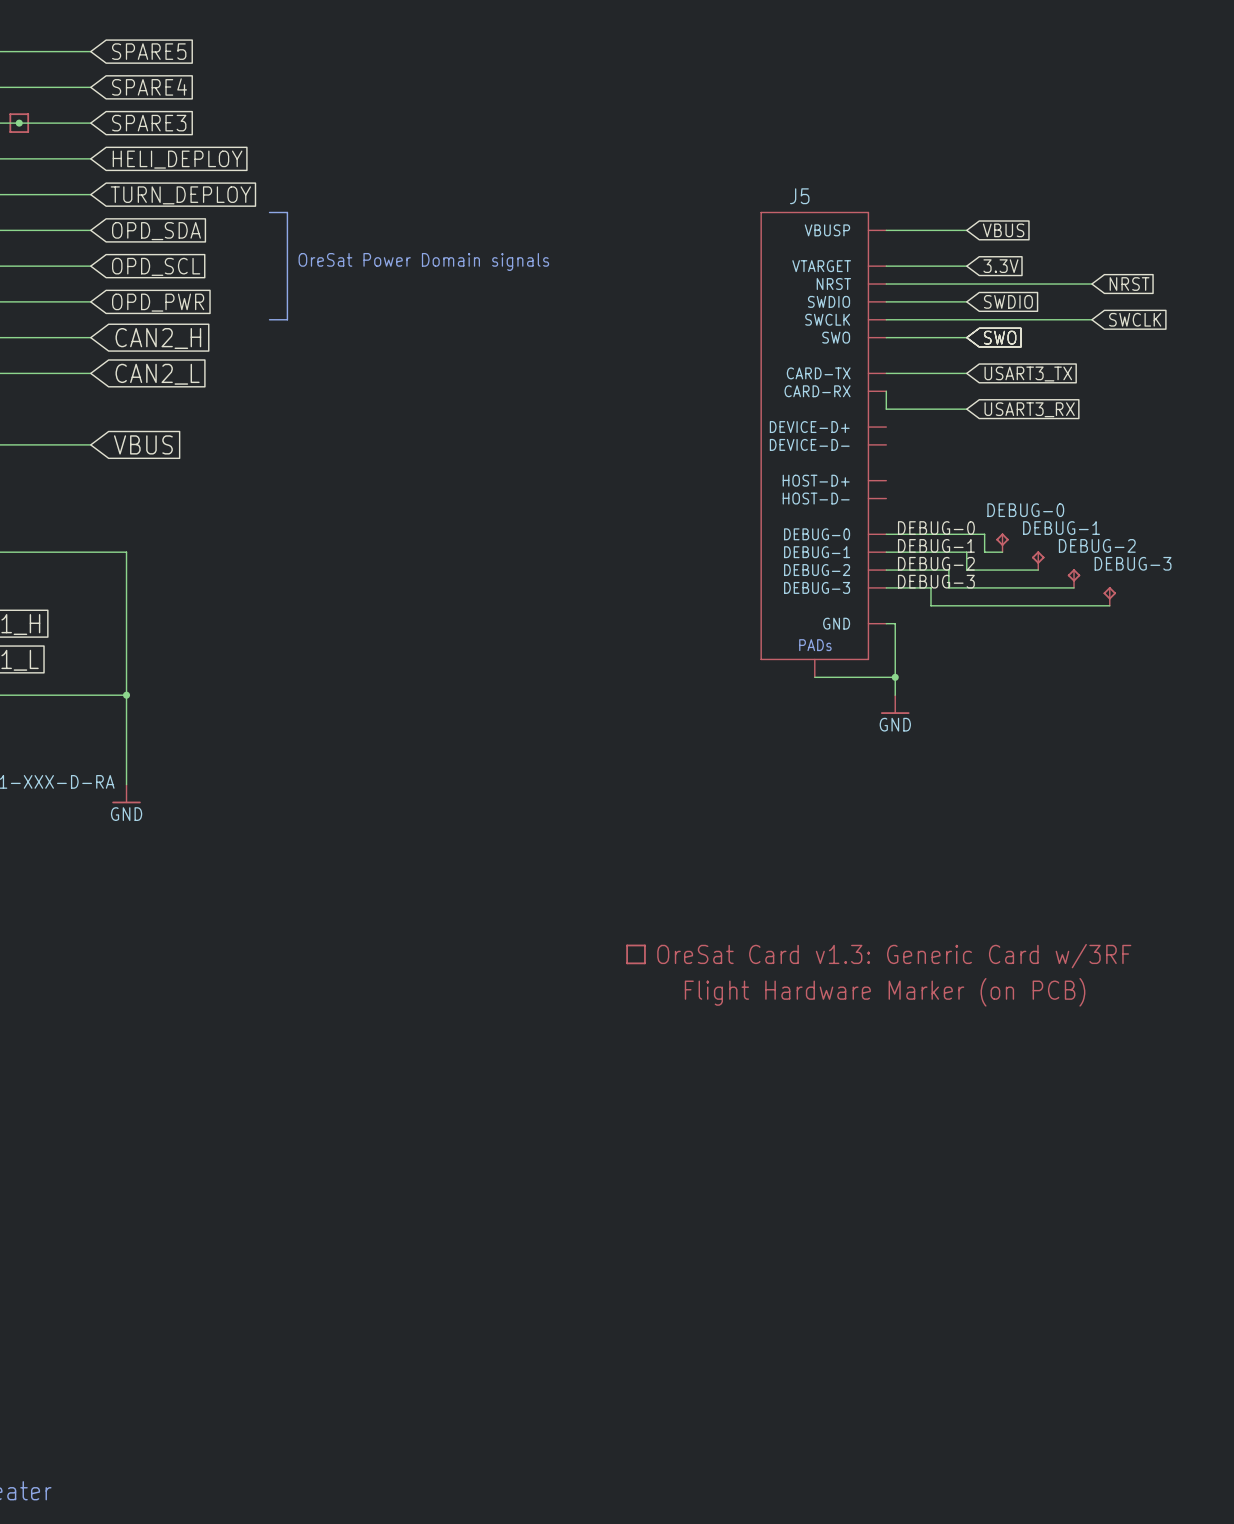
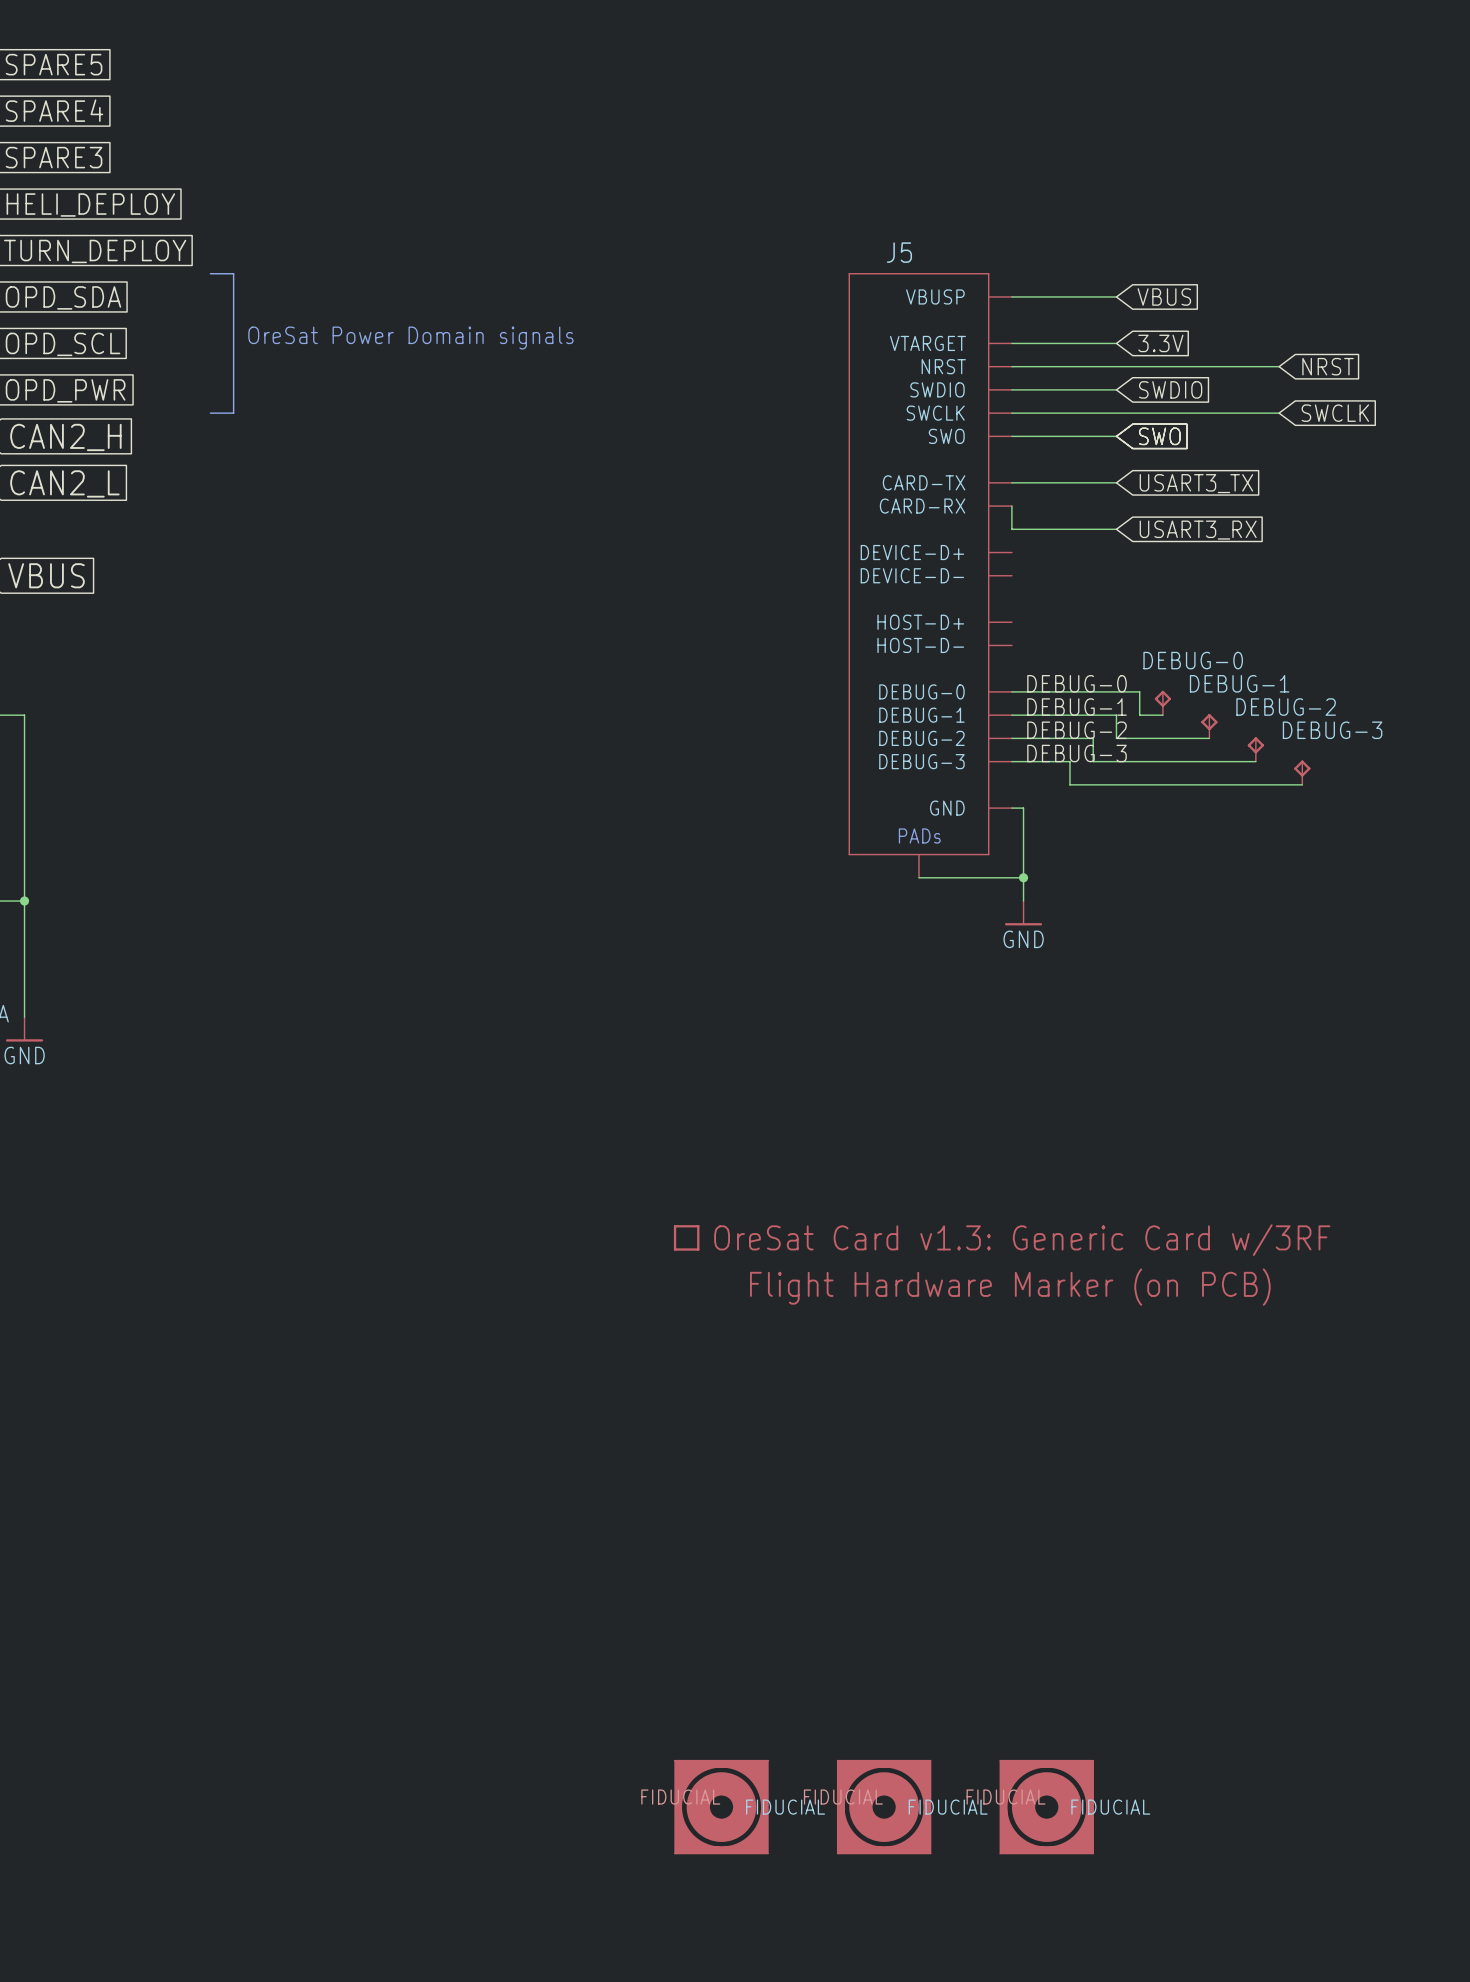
part: none -> (721, 1807)
part: none -> (884, 1807)
part: none -> (1046, 1807)

